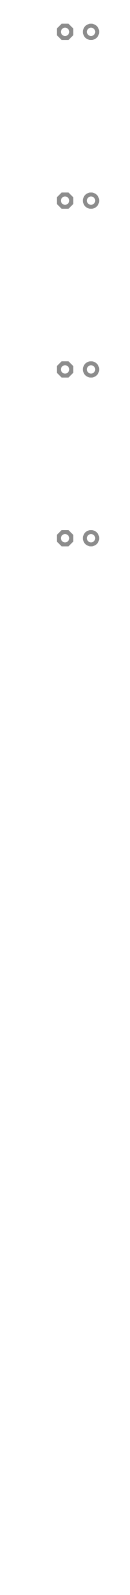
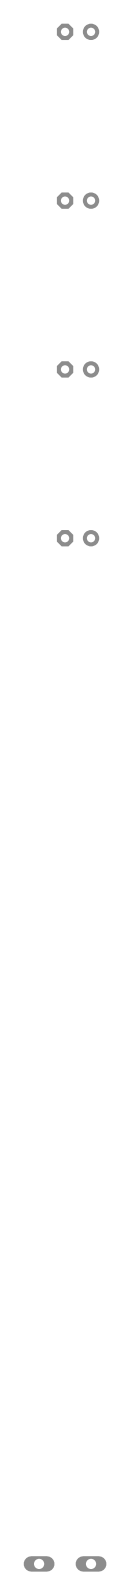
part: none -> (65, 1563)

